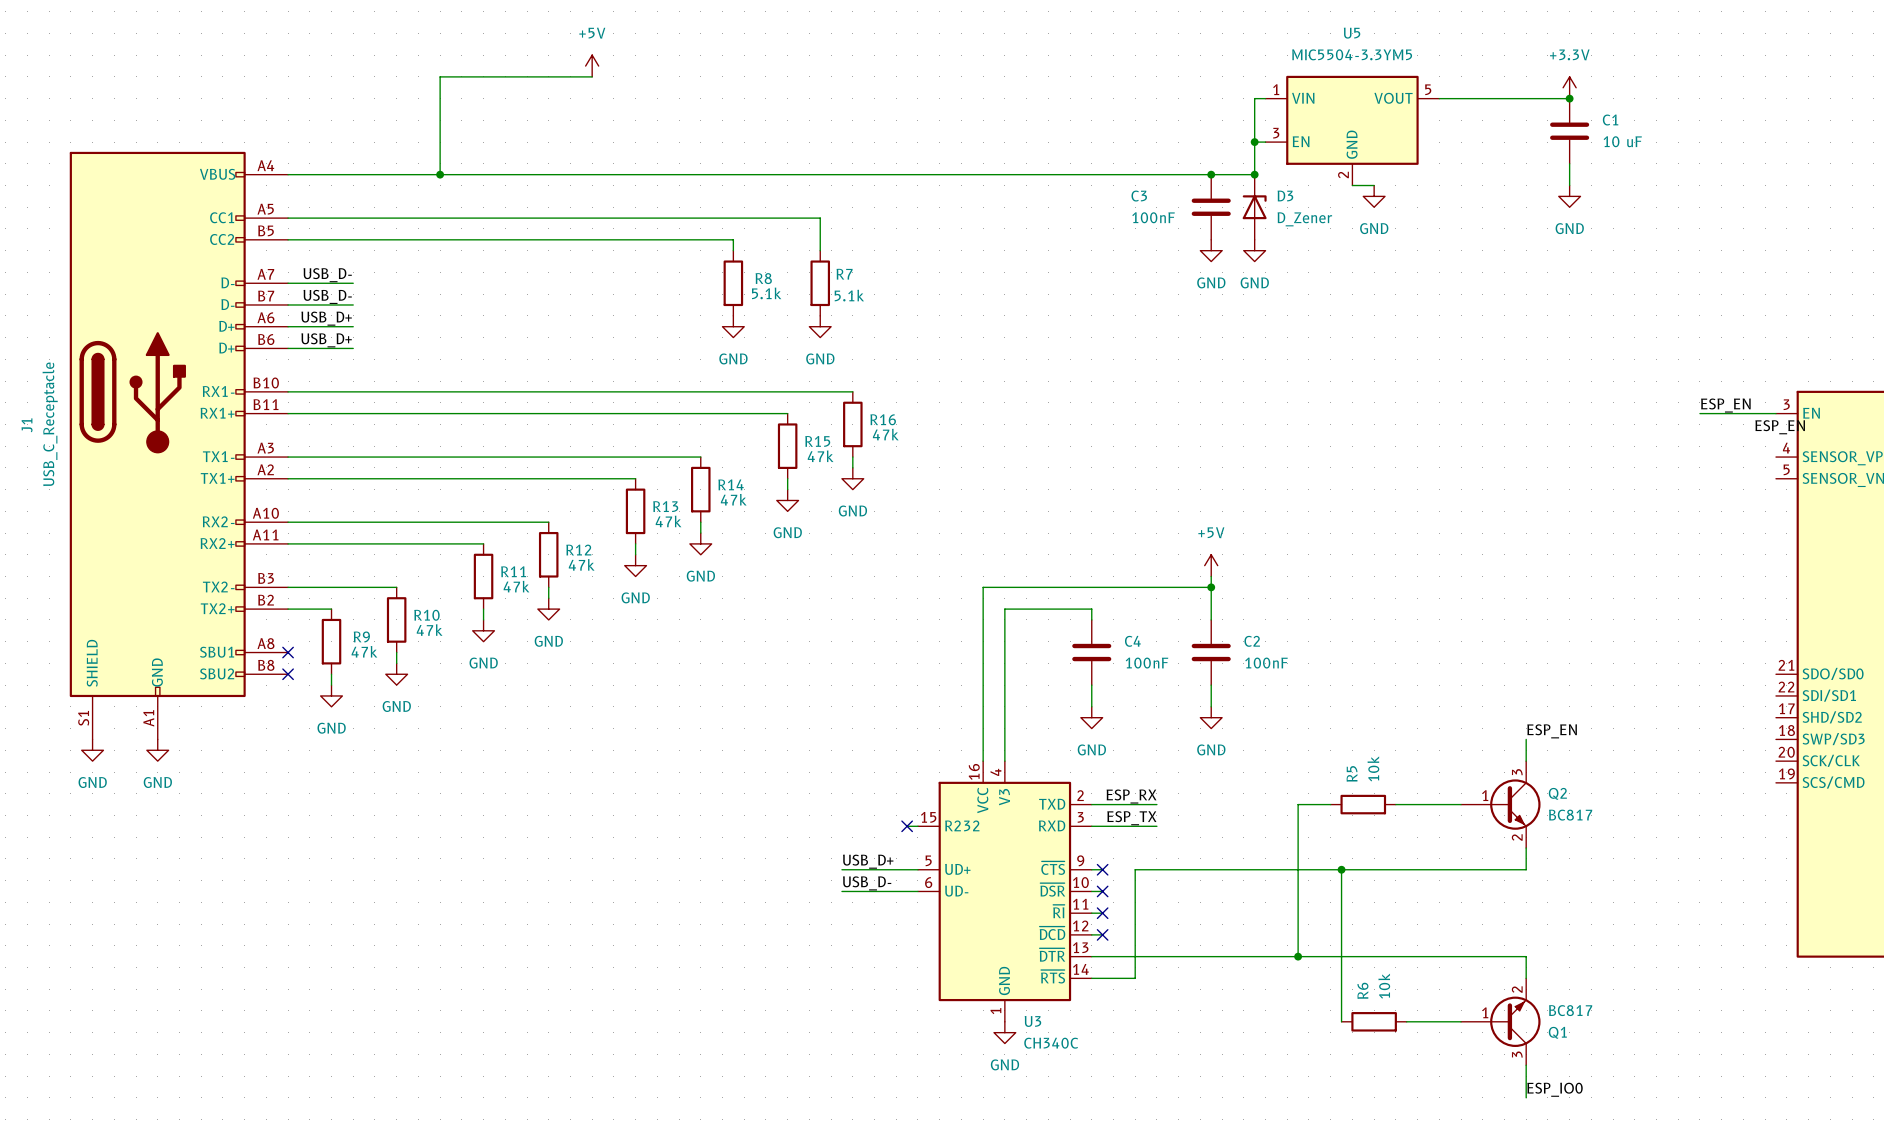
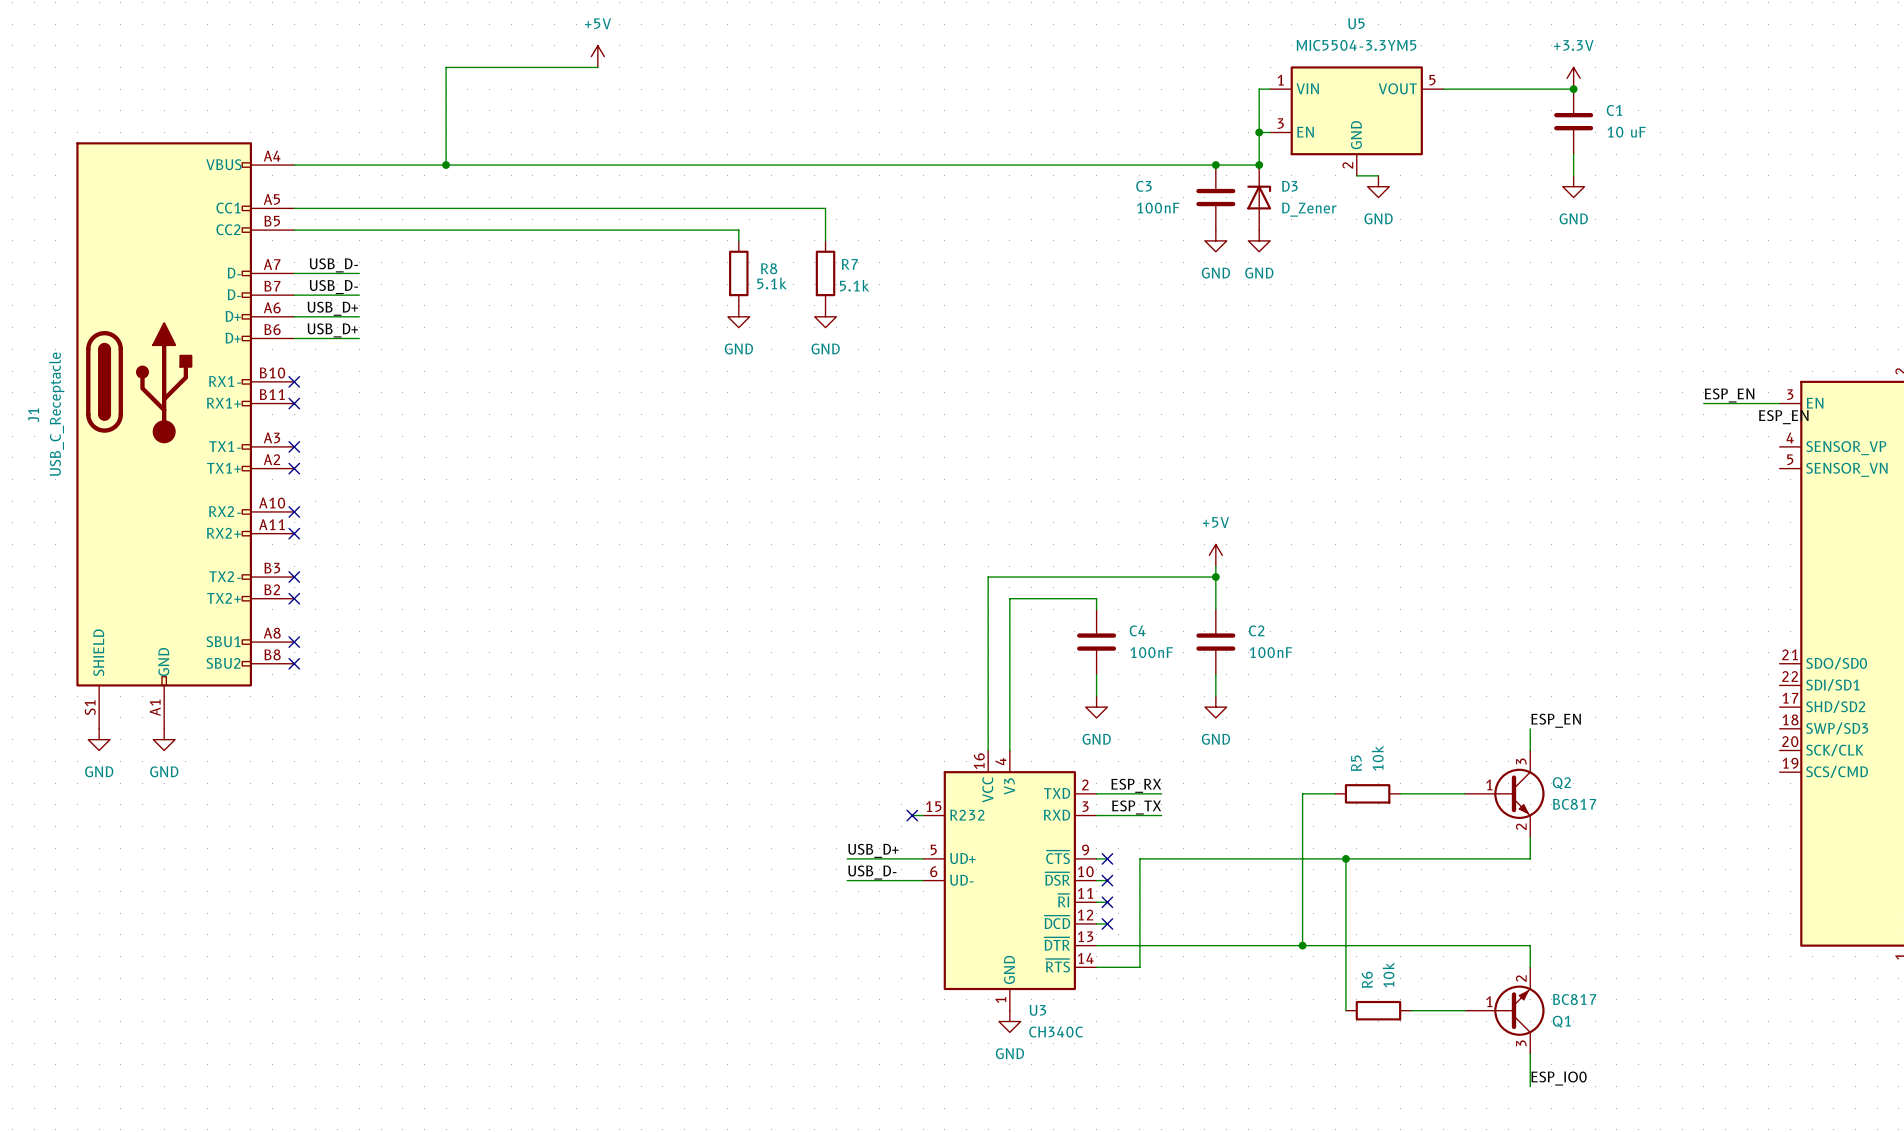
wire: (288, 391) (852, 391) -> none
no-connect mark: none -> (294, 381)
wire: (288, 413) (787, 413) -> none
no-connect mark: none -> (294, 403)
R16: 47k (852, 424) -> none
R15: 47k (787, 446) -> none
wire: (288, 457) (700, 457) -> none
no-connect mark: none -> (294, 446)
wire: (852, 457) (852, 467) -> none
wire: (288, 478) (635, 478) -> none
no-connect mark: none -> (294, 468)
wire: (787, 478) (787, 489) -> none
power symbol: GND (852, 478) -> none
R14: 47k (700, 489) -> none
power symbol: GND (787, 500) -> none
R13: 47k (635, 511) -> none
wire: (288, 522) (548, 522) -> none
no-connect mark: none -> (294, 511)
wire: (700, 522) (700, 533) -> none
wire: (288, 543) (483, 543) -> none
no-connect mark: none -> (294, 533)
wire: (635, 543) (635, 554) -> none
power symbol: GND (700, 543) -> none
R12: 47k (548, 554) -> none
power symbol: GND (635, 565) -> none
R11: 47k (483, 576) -> none
wire: (288, 587) (396, 587) -> none
no-connect mark: none -> (294, 577)
wire: (548, 587) (548, 598) -> none
wire: (288, 609) (331, 609) -> none
no-connect mark: none -> (294, 598)
wire: (483, 609) (483, 619) -> none
power symbol: GND (548, 609) -> none
R10: 47k (396, 619) -> none
power symbol: GND (483, 630) -> none
R9: 47k (331, 641) -> none
wire: (396, 652) (396, 663) -> none
wire: (331, 674) (331, 685) -> none
power symbol: GND (396, 674) -> none
power symbol: GND (331, 695) -> none

